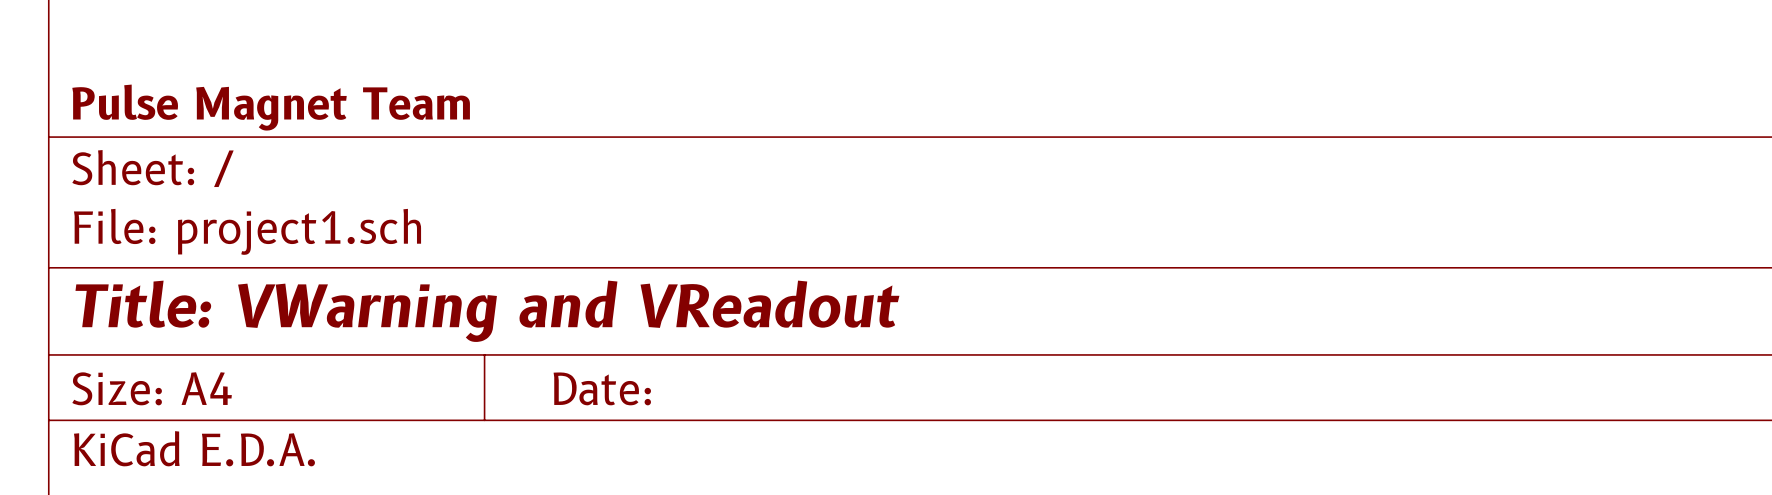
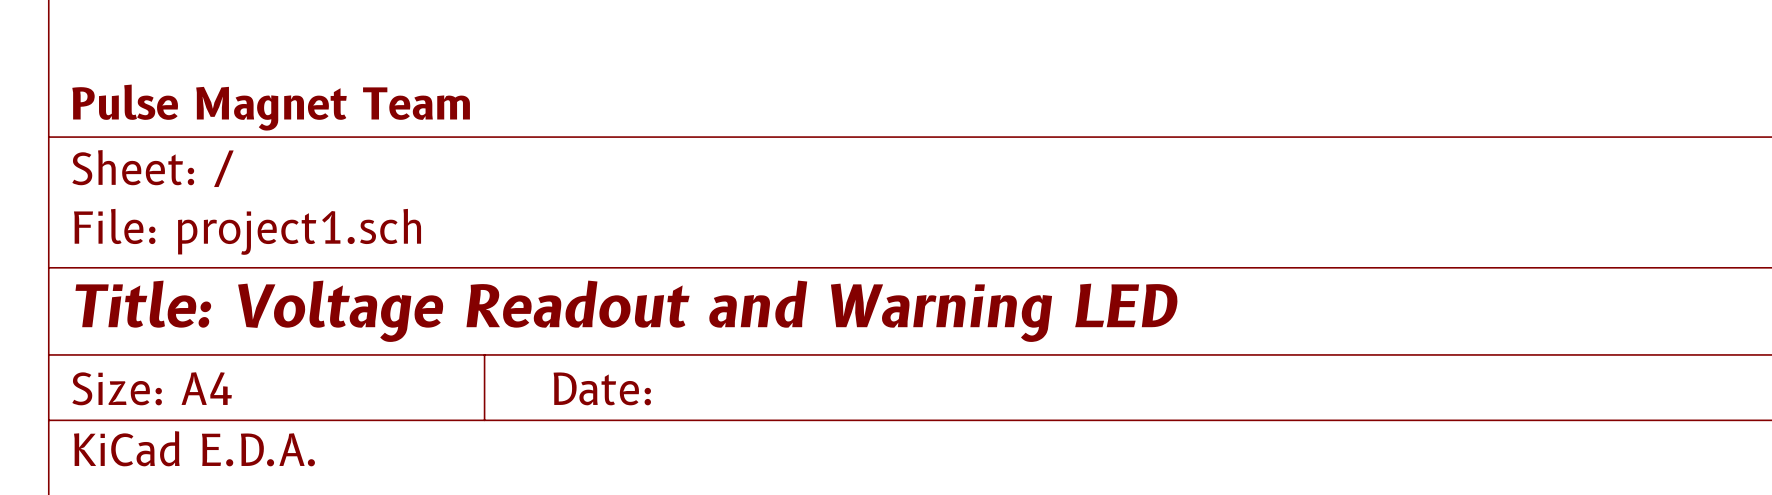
title block: Title: VWarning and VReadout (487, 311) -> Title: Voltage Readout and Warning LED (626, 311)

